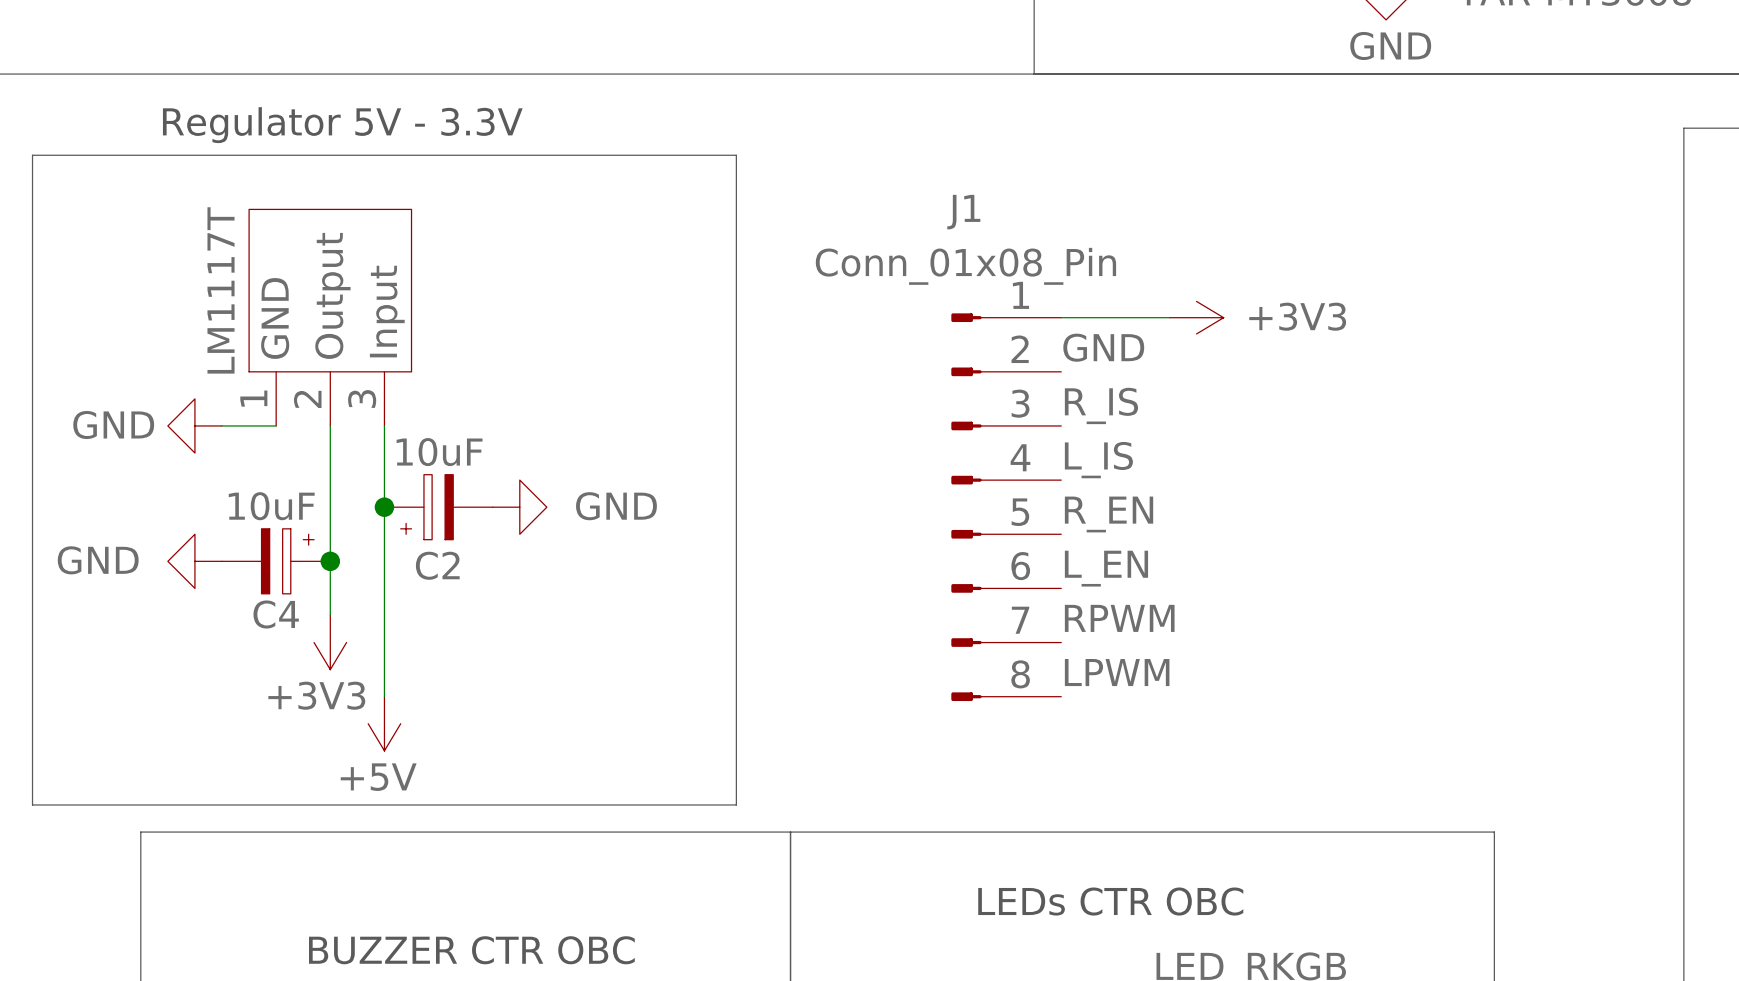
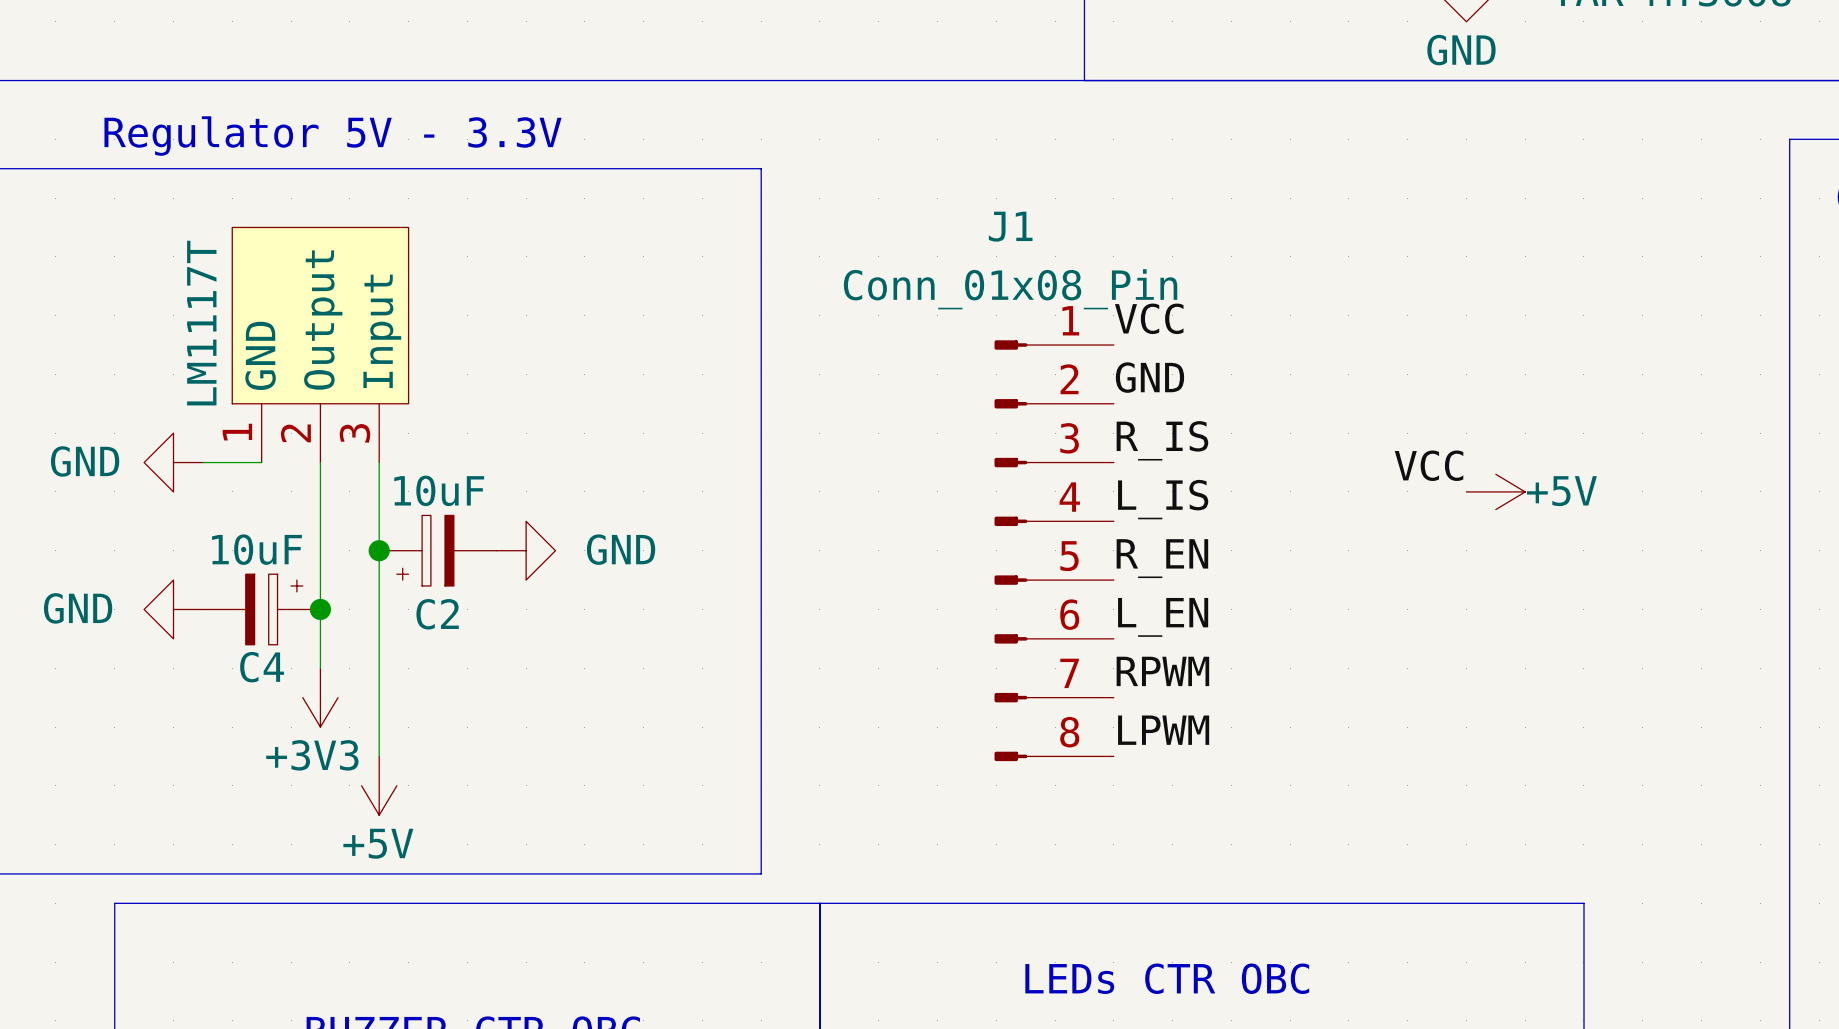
label: none -> VCC (1149, 318)
wire: (1061, 317) (1169, 317) -> none
power symbol: +3V3 (1196, 317) -> none
label: none -> VCC (1429, 465)
power symbol: none -> +5V (1495, 491)

